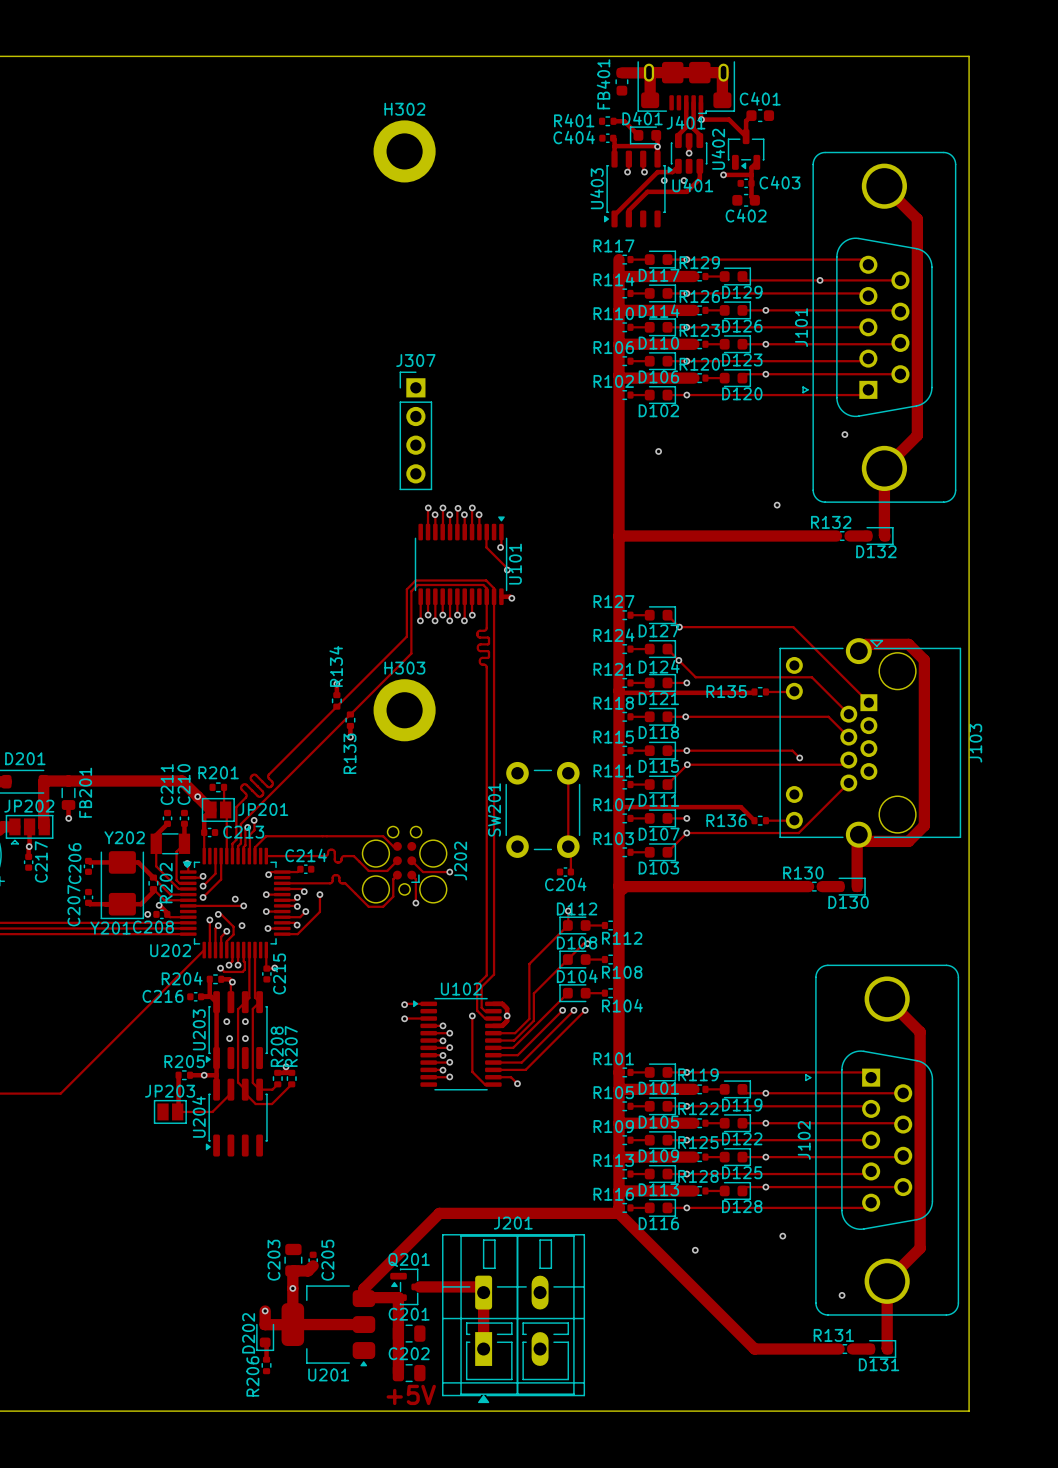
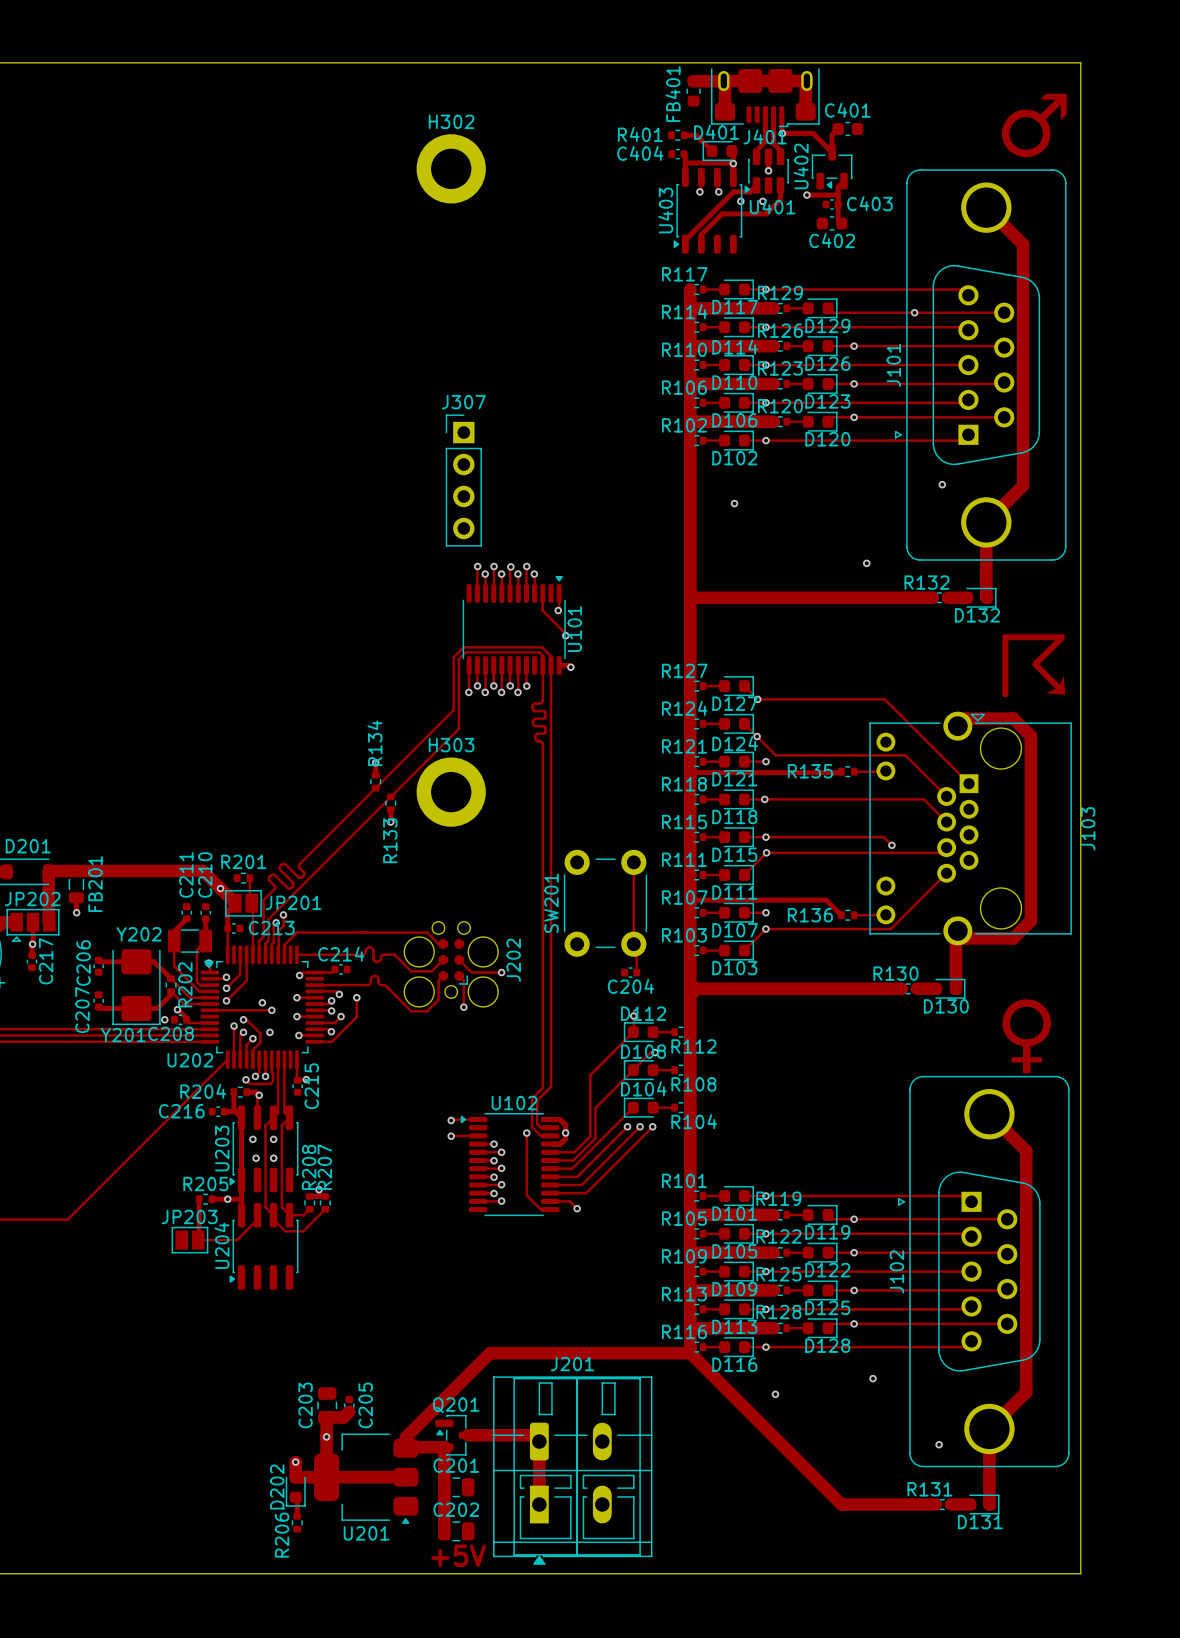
text: none -> ♂ (1034, 125)
text: none -> ☈ (1033, 665)
text: none -> ♀ (1026, 1036)

